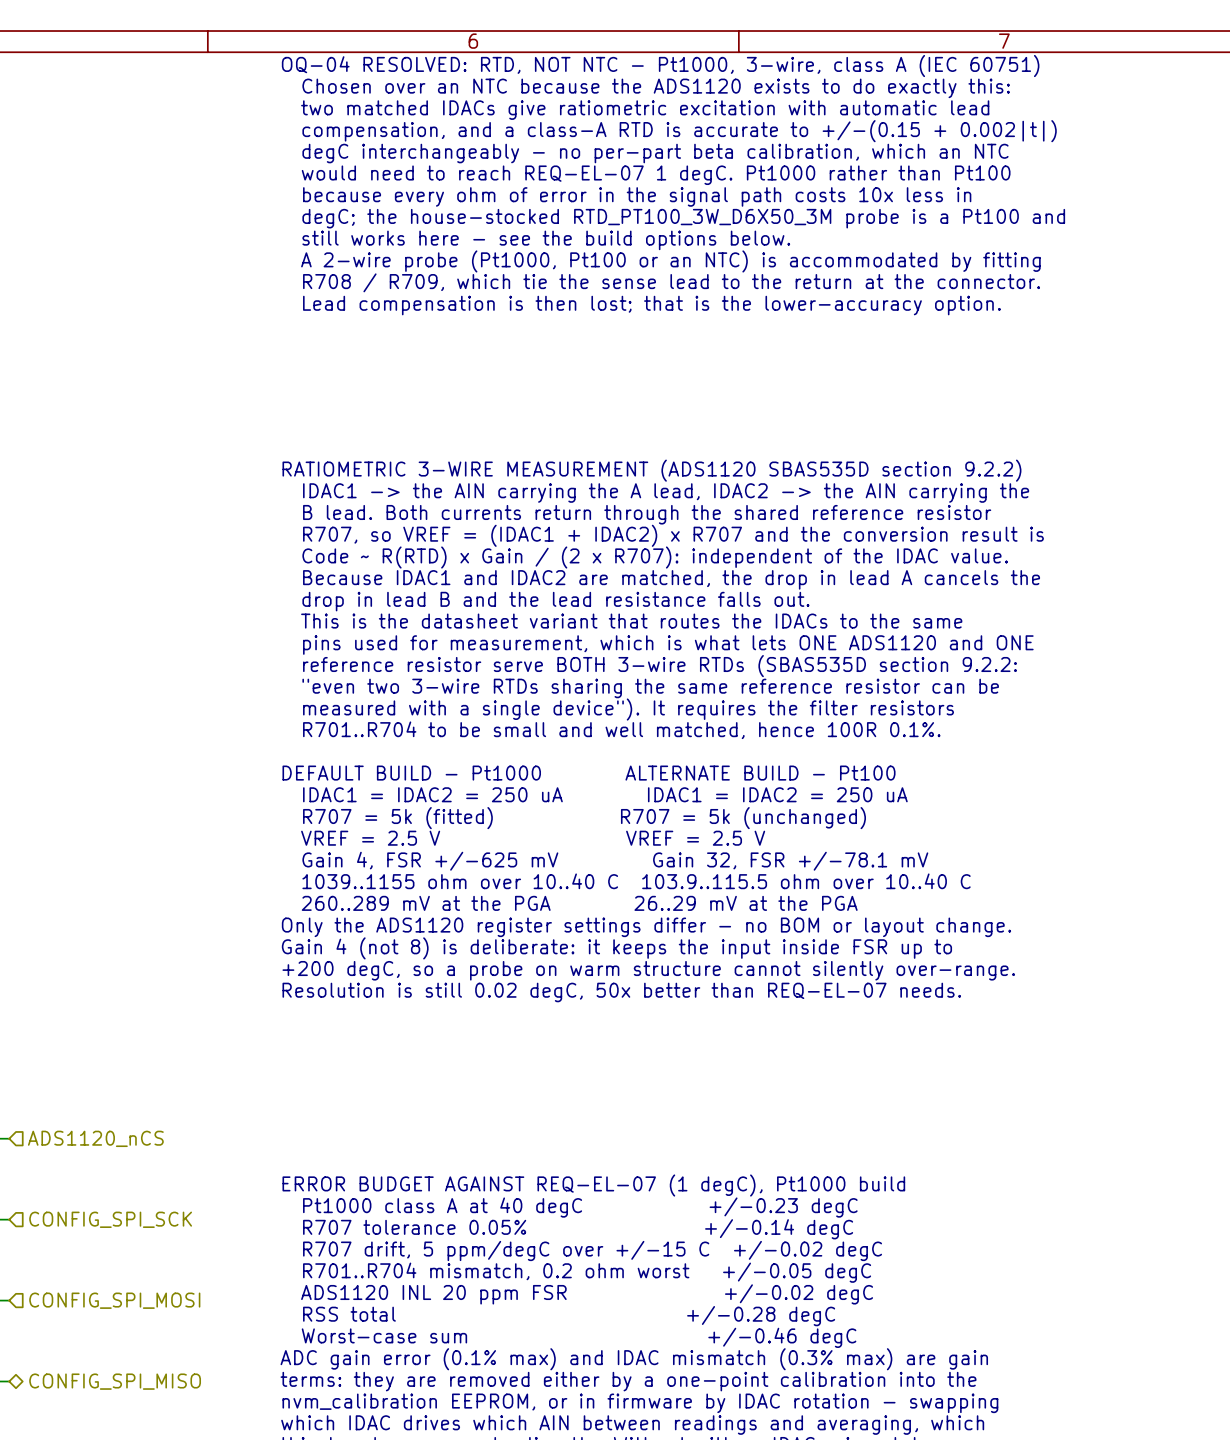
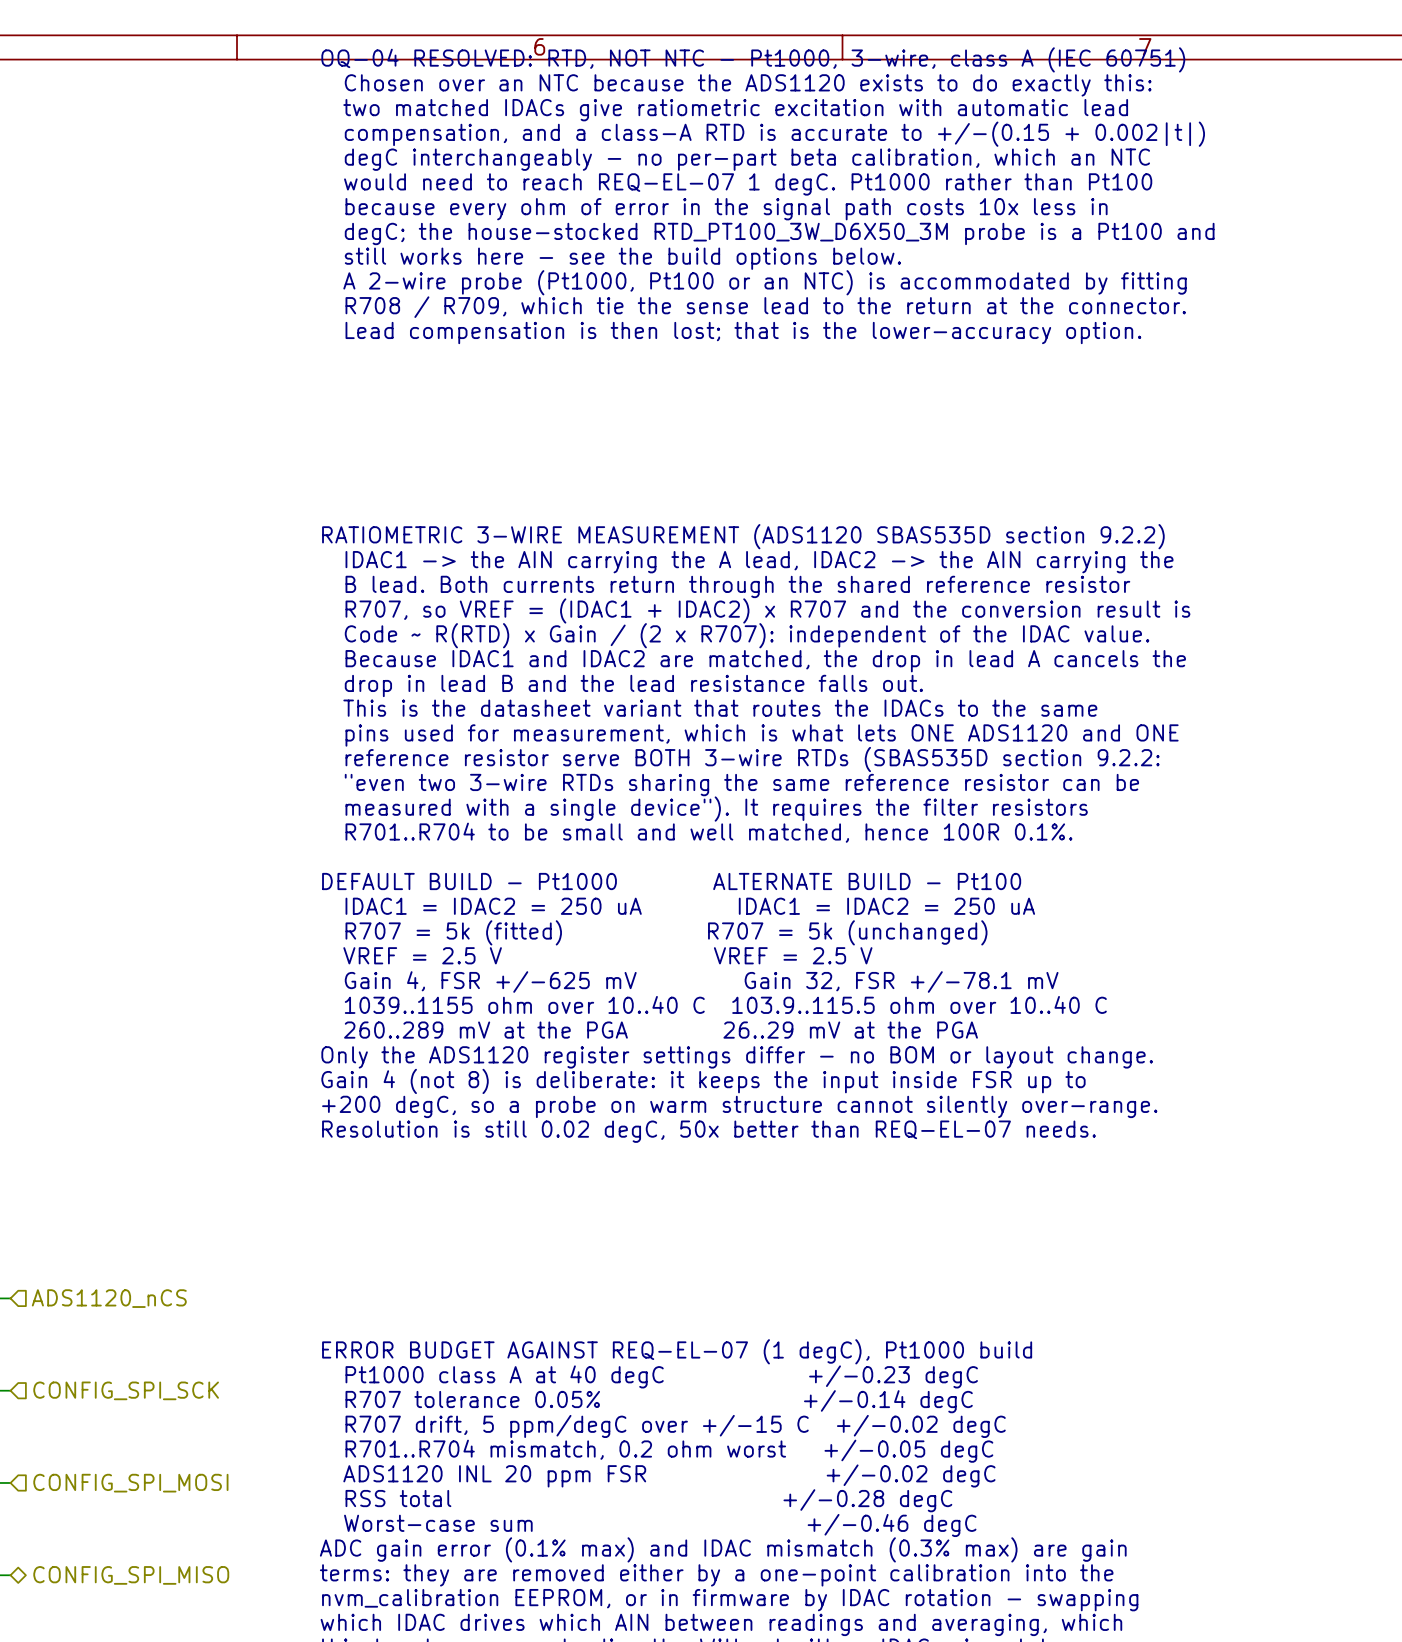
text position: OQ-04 RESOLVED: RTD, NOT NTC - Pt1000, 3-wire, class A (IEC 60751) (660, 66) -> OQ-04 RESOLVED: RTD, NOT NTC - Pt1000, 3-wire, class A (IEC 60751) (753, 59)
text position: Chosen over an NTC because the ADS1120 exists to do exactly this: (656, 88) -> Chosen over an NTC because the ADS1120 exists to do exactly this: (748, 85)
text position: two matched IDACs give ratiometric excitation with automatic lead (645, 110) -> two matched IDACs give ratiometric excitation with automatic lead (735, 110)
text position: compensation, and a class-A RTD is accurate to +/-(0.15 + 0.002|t|) (679, 131) -> compensation, and a class-A RTD is accurate to +/-(0.15 + 0.002|t|) (774, 134)
text position: degC interchangeably - no per-part beta calibration, which an NTC (655, 153) -> degC interchangeably - no per-part beta calibration, which an NTC (747, 159)
text position: would need to reach REQ-EL-07 1 degC. Pt1000 rather than Pt100 (656, 175) -> would need to reach REQ-EL-07 1 degC. Pt1000 rather than Pt100 (748, 184)
text position: because every ohm of error in the signal path costs 10x less in (637, 196) -> because every ohm of error in the signal path costs 10x less in (726, 209)
text position: degC; the house-stocked RTD_PT100_3W_D6X50_3M probe is a Pt100 and (683, 218) -> degC; the house-stocked RTD_PT100_3W_D6X50_3M probe is a Pt100 and (779, 233)
text position: still works here - see the build options below. (546, 240) -> still works here - see the build options below. (622, 258)
text position: A 2-wire probe (Pt1000, Pt100 or an NTC) is accommodated by fitting (670, 261) -> A 2-wire probe (Pt1000, Pt100 or an NTC) is accommodated by fitting (765, 282)
text position: R708 / R709, which tie the sense lead to the return at the connector. (671, 282) -> R708 / R709, which tie the sense lead to the return at the connector. (765, 307)
text position: Lead compensation is then lost; that is the lower-accuracy option. (651, 305) -> Lead compensation is then lost; that is the lower-accuracy option. (743, 333)

